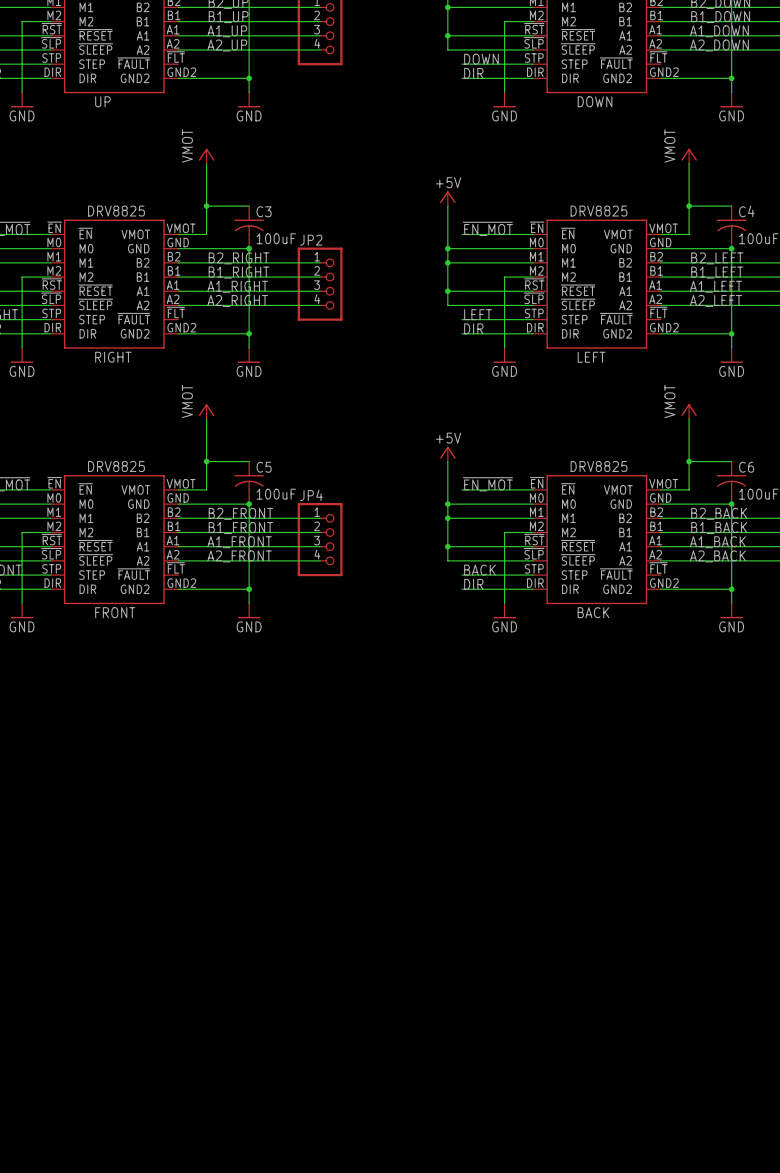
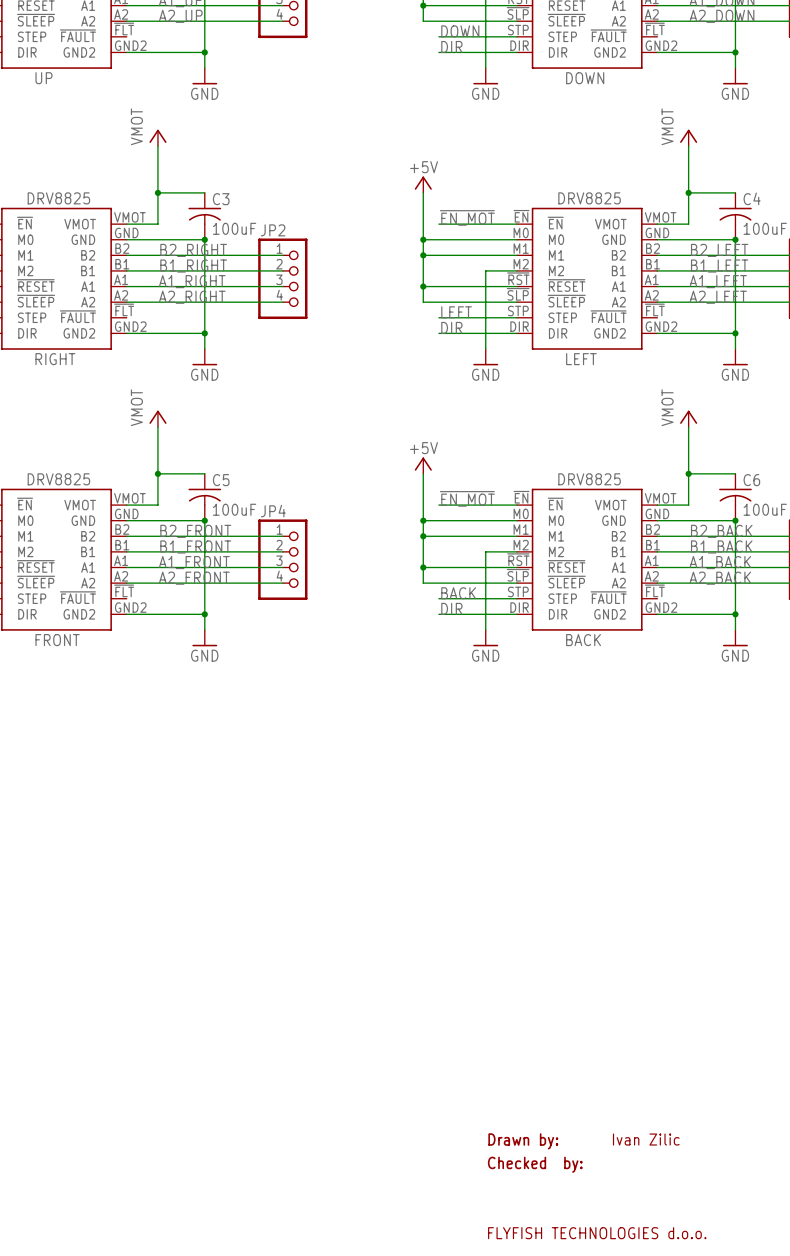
text: none -> Ivan Zilic (646, 1139)
text: none -> Drawn by: (523, 1141)
text: none -> Checked by: (535, 1164)
text: none -> FLYFISH TECHNOLOGIES d.o.o. (597, 1233)

